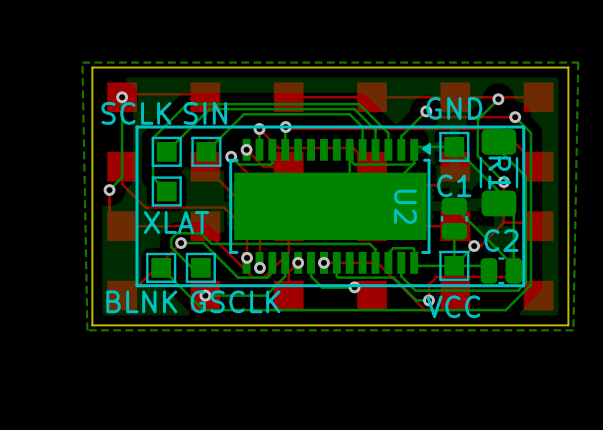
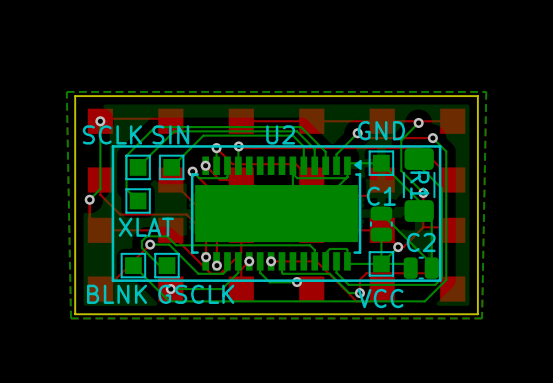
U2 name rotation: 0° (405, 206) -> 90° counterclockwise (280, 134)
U2 name position: U2 (405, 206) -> U2 (280, 134)

